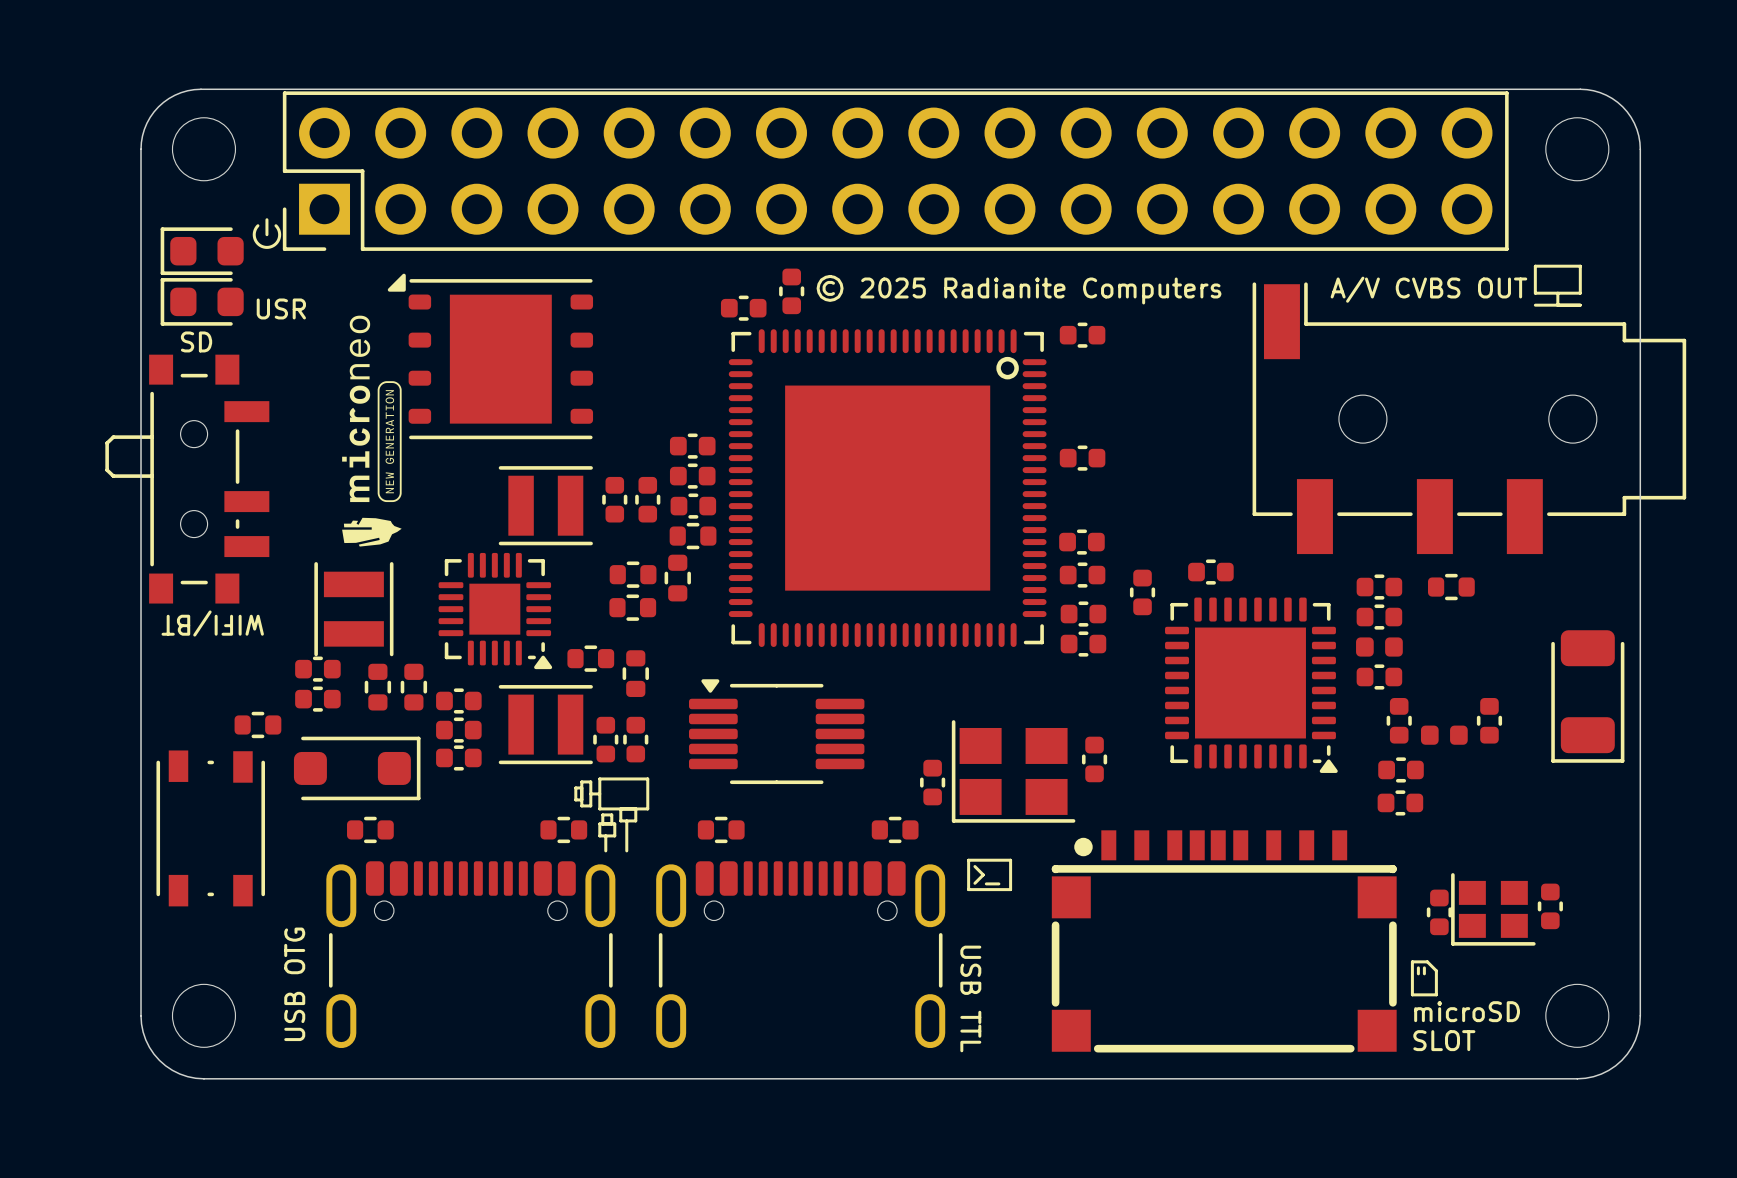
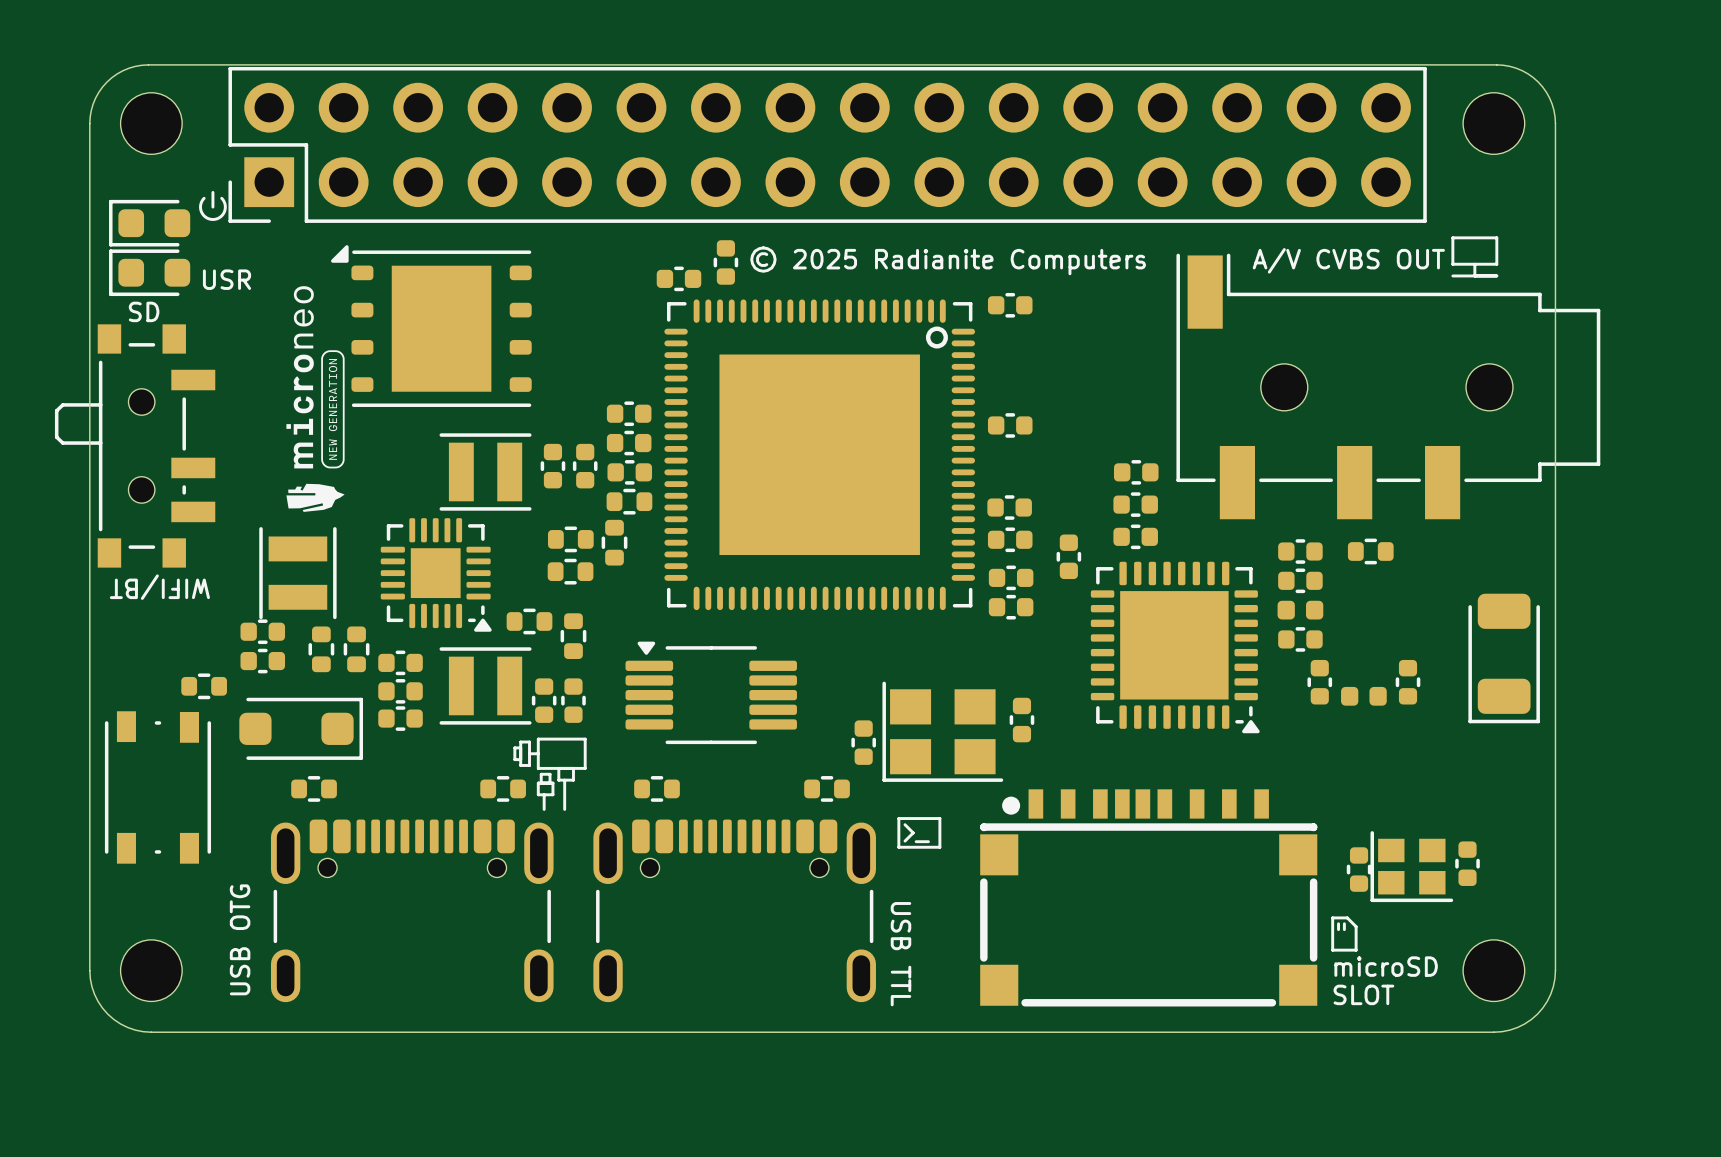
part: none -> (1136, 472)
part: none -> (1135, 504)
part: (1401, 769) -> none
part: (1400, 802) -> none

